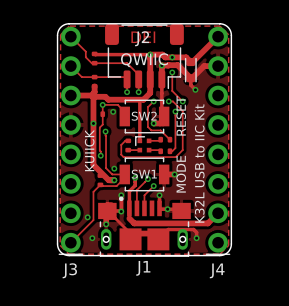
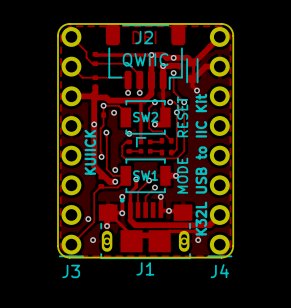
track: (178, 66) (190, 78) -> none
track: none -> (193, 66) (193, 87) (197, 90)
via: none -> (129, 133)

